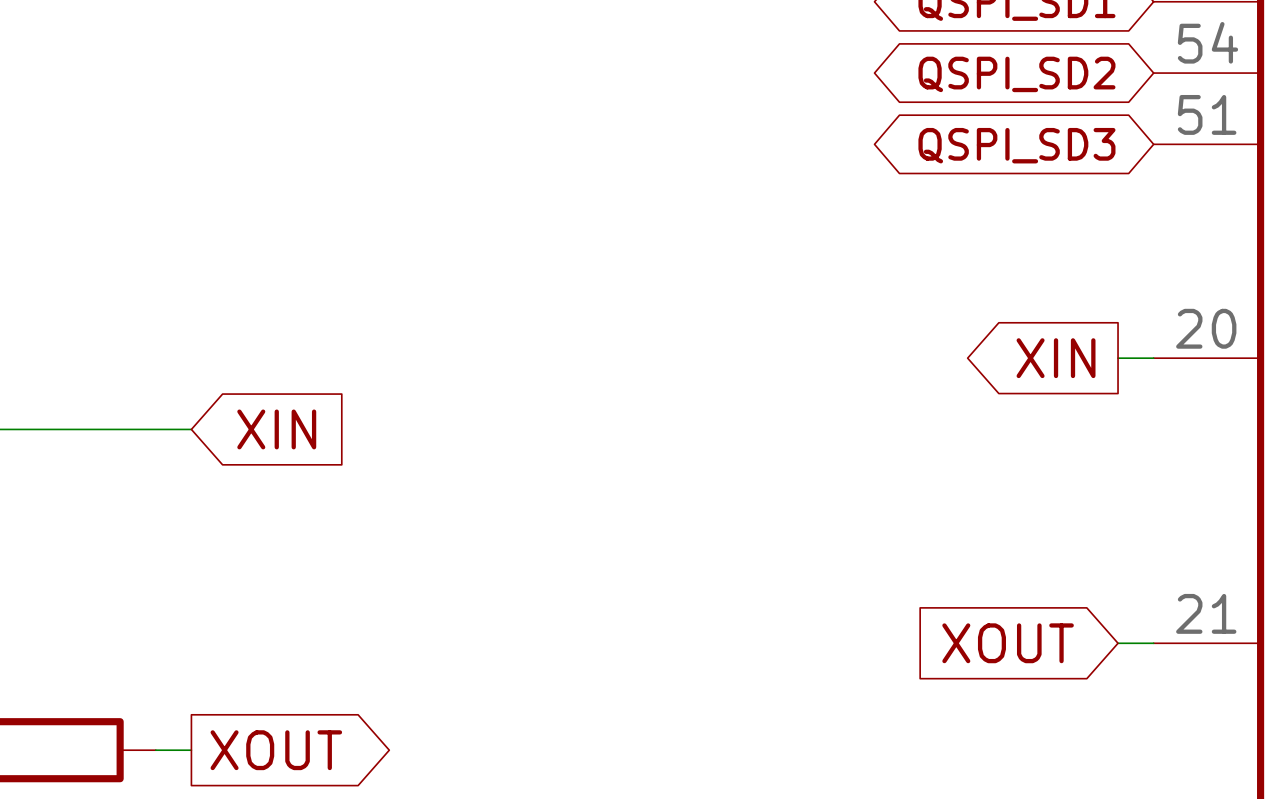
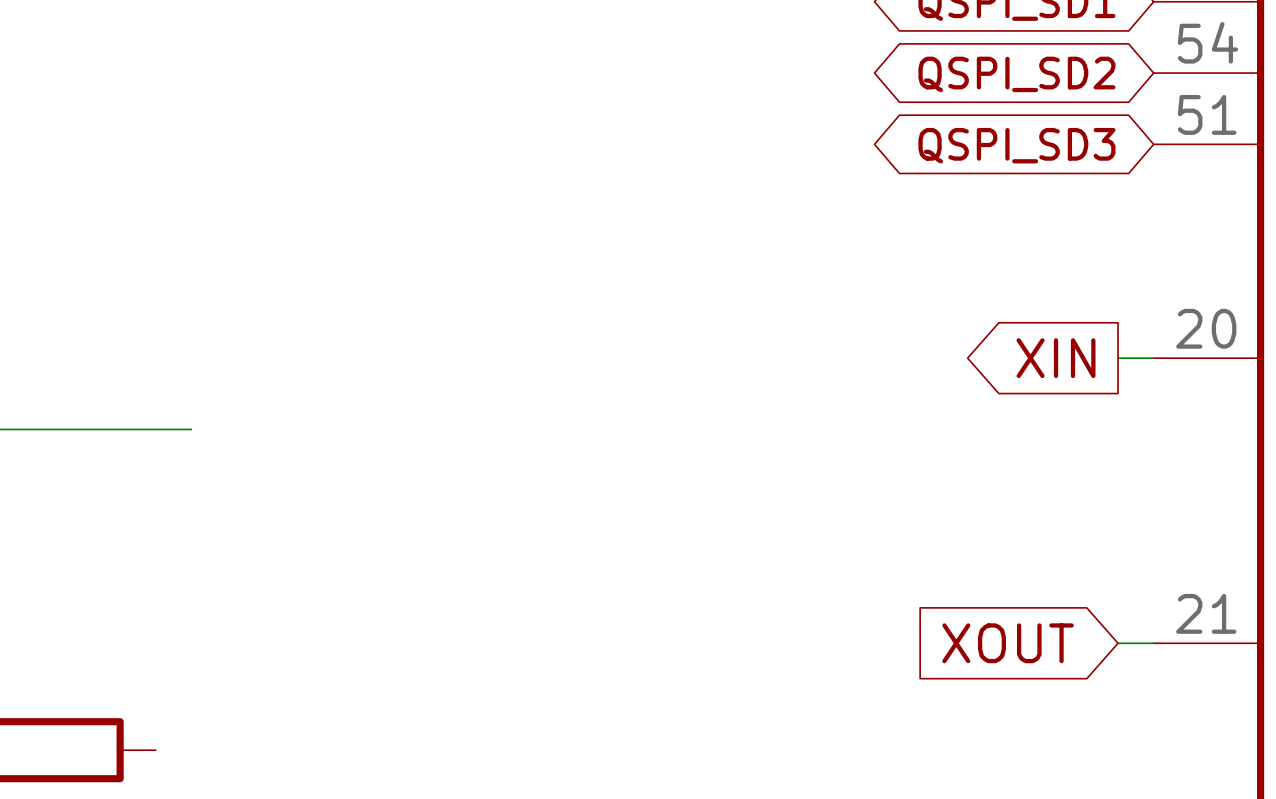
global label: XIN (276, 429) -> none
wire: (155, 750) (191, 750) -> none
global label: XOUT (276, 750) -> none

